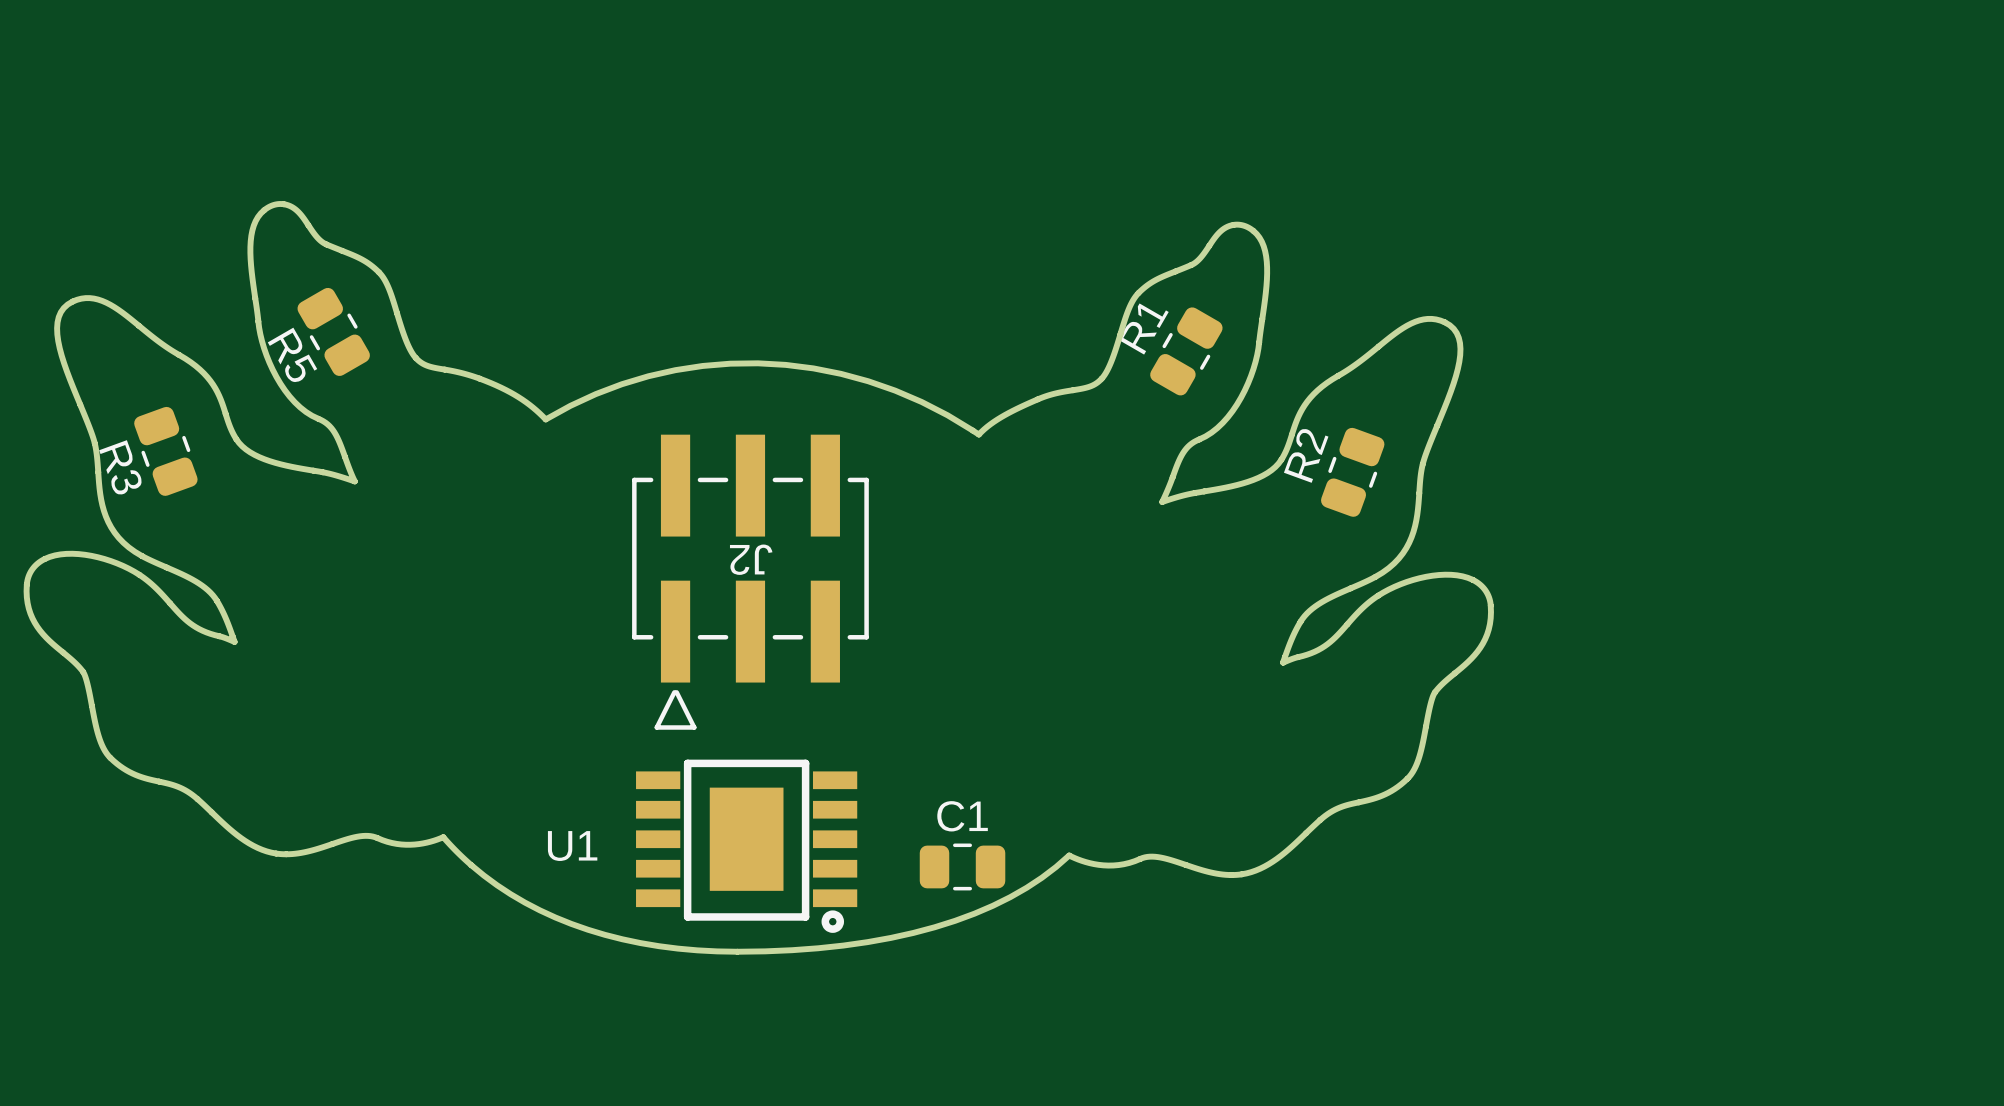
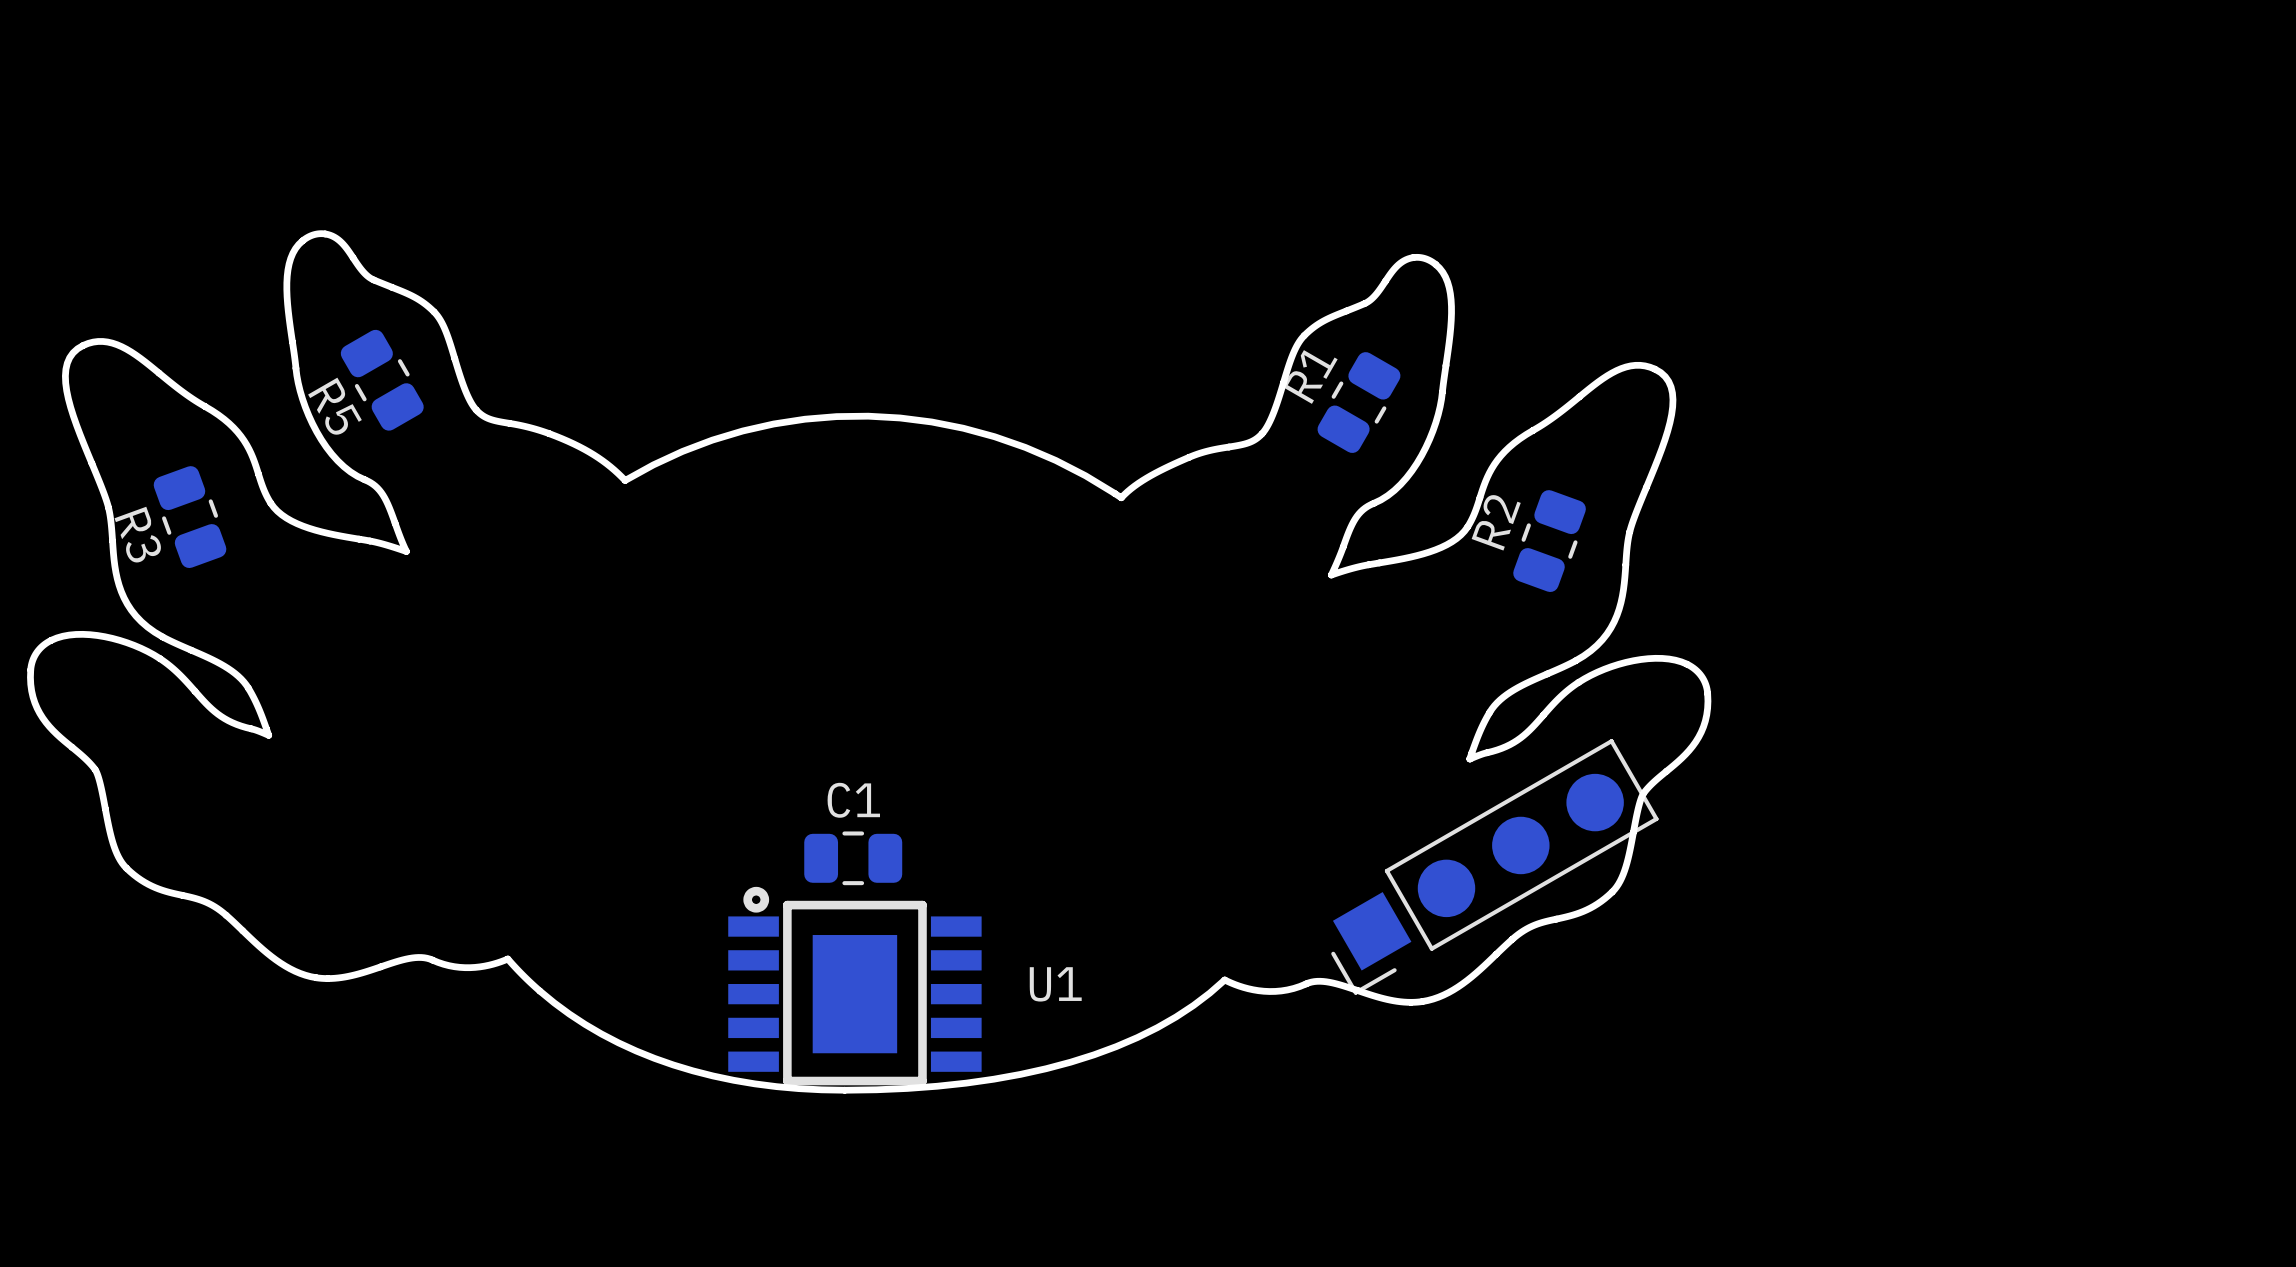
J2: (750, 582) -> none
part: none -> (1494, 866)
U1 rotation: 0° (746, 846) -> 180° (854, 986)
C1 position: (962, 866) -> (853, 858)

